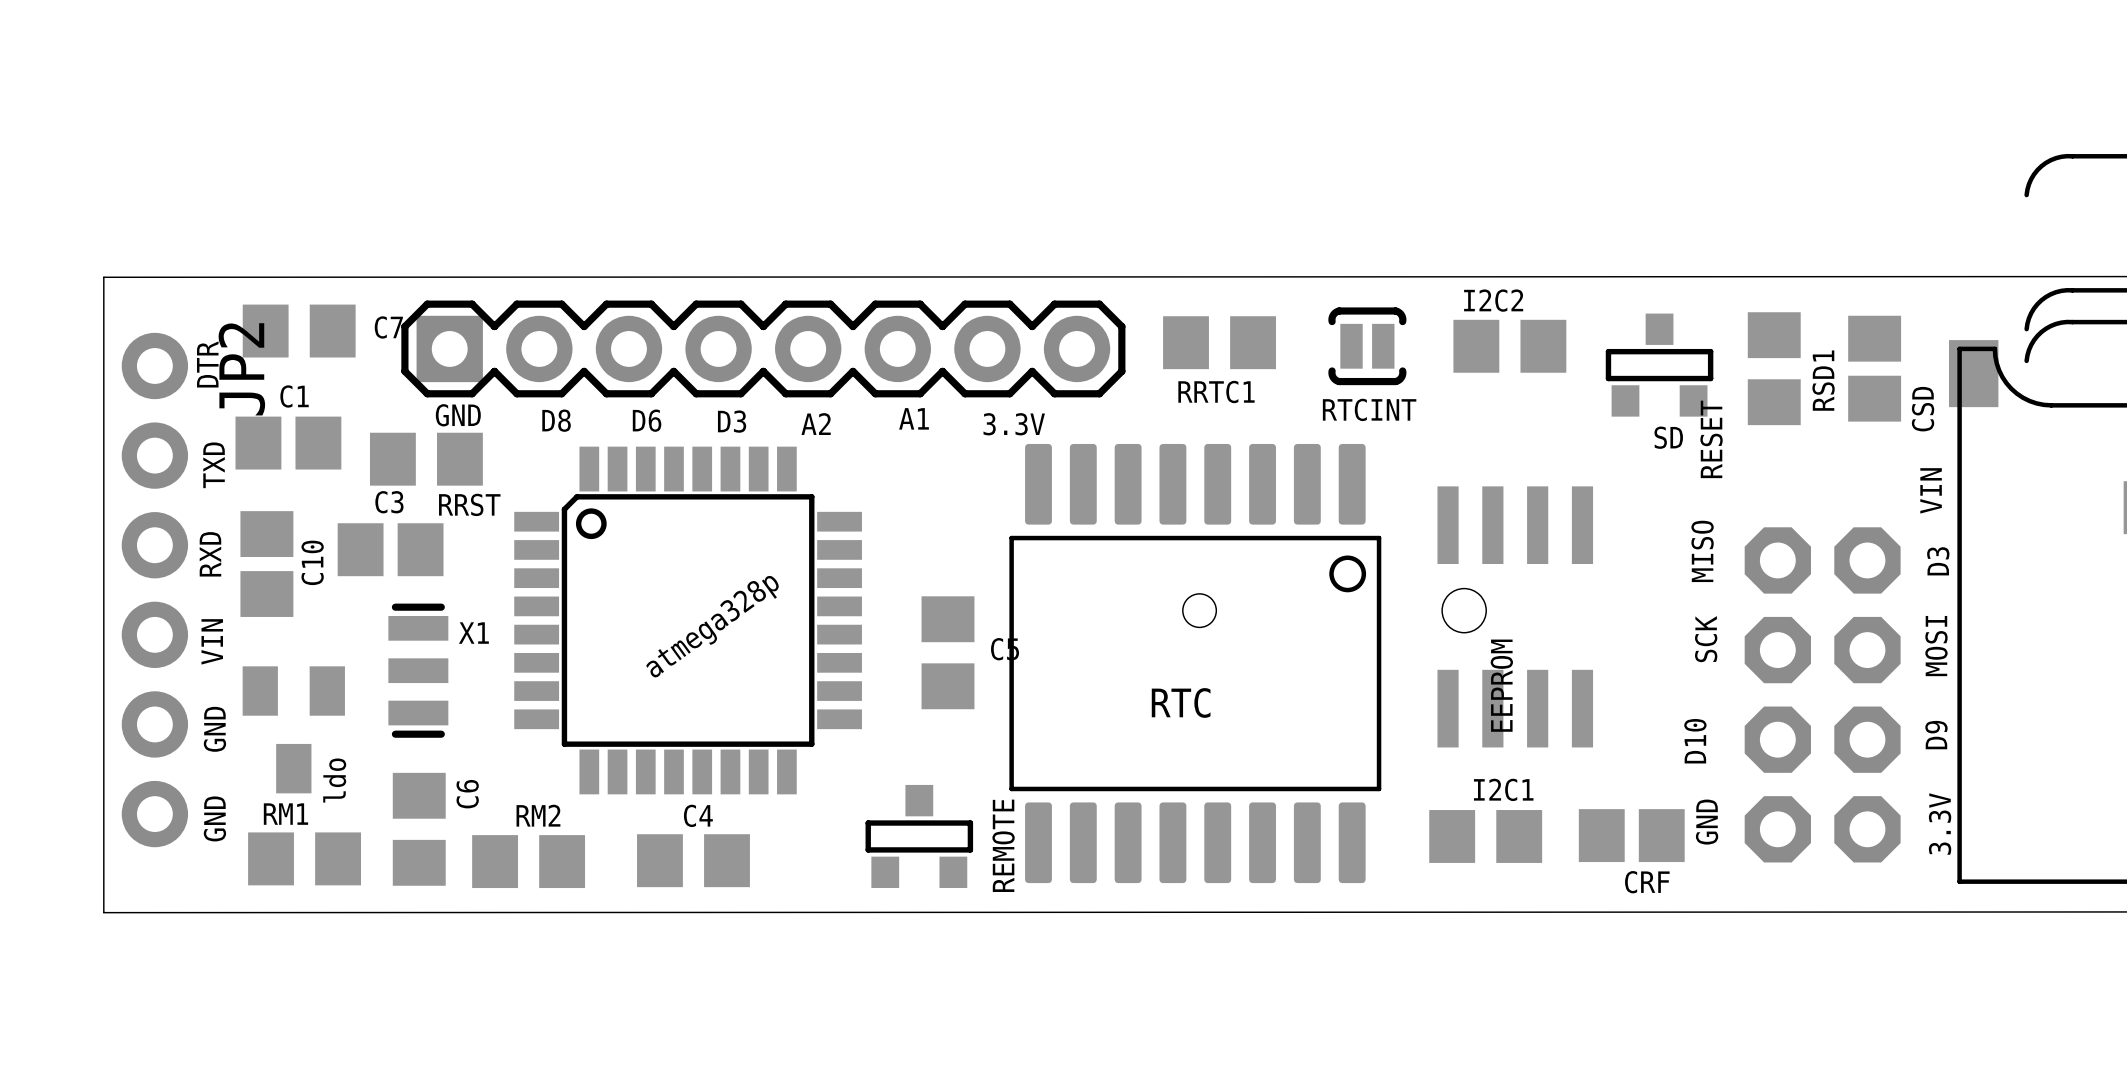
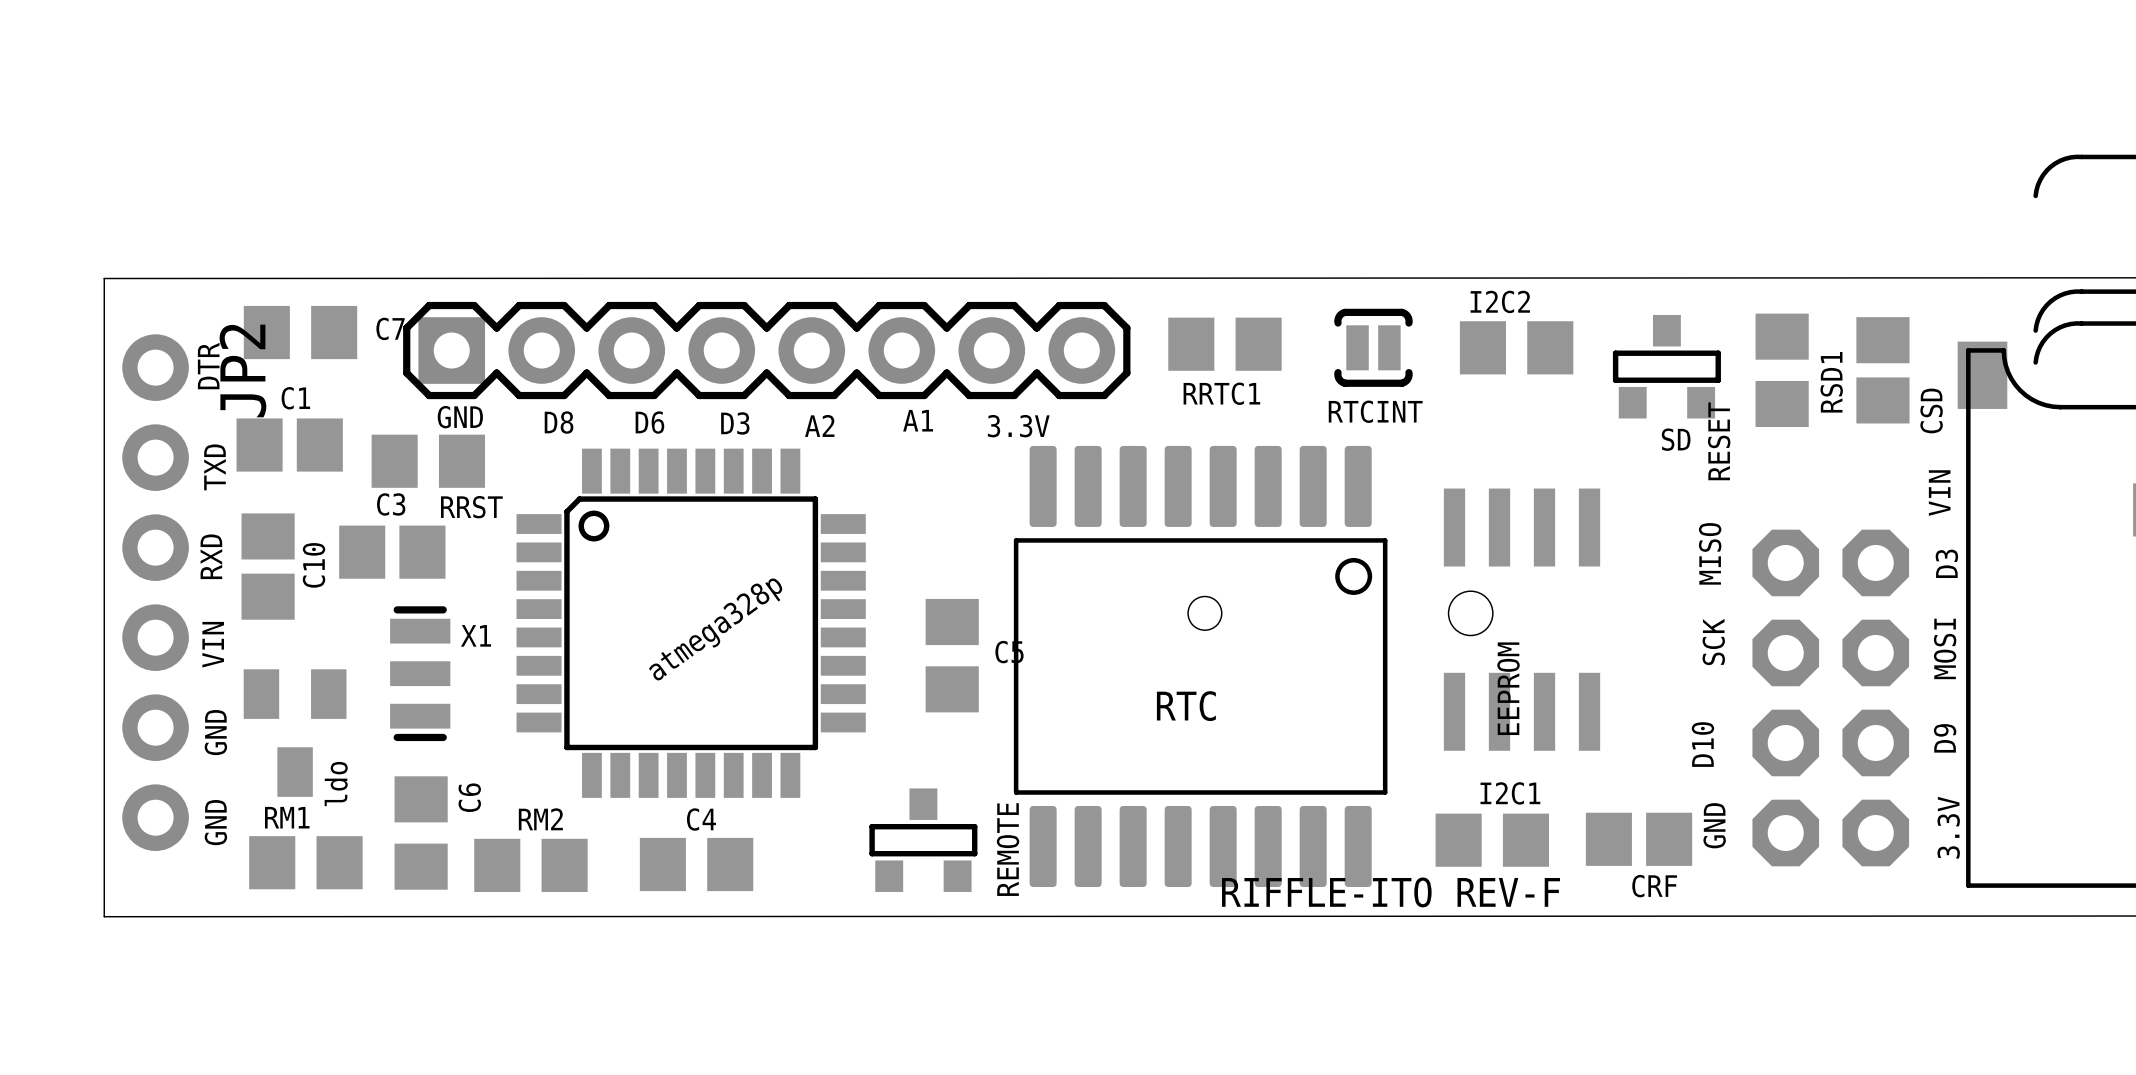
text: none -> RIFFLE-ITO REV-F (1391, 892)

